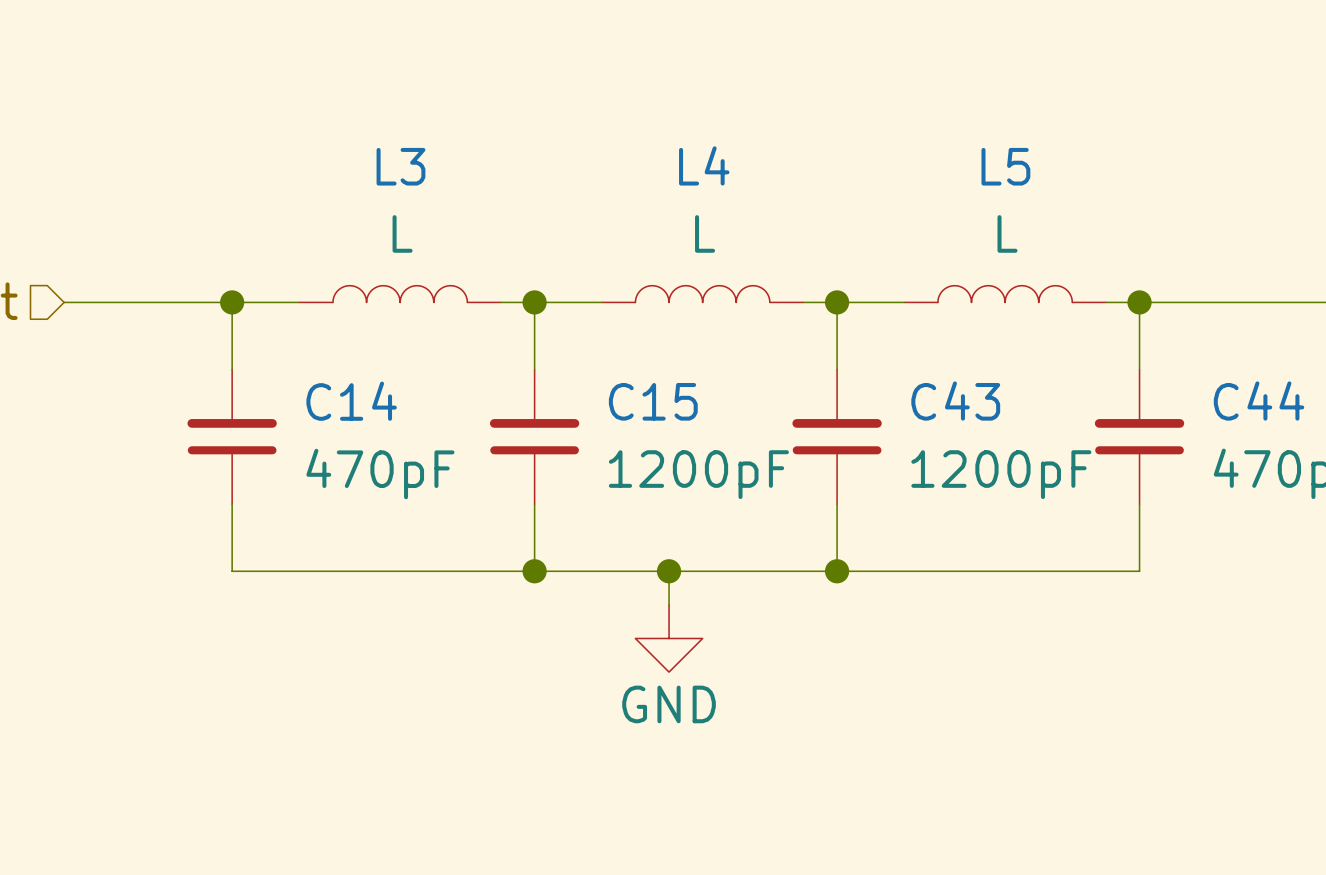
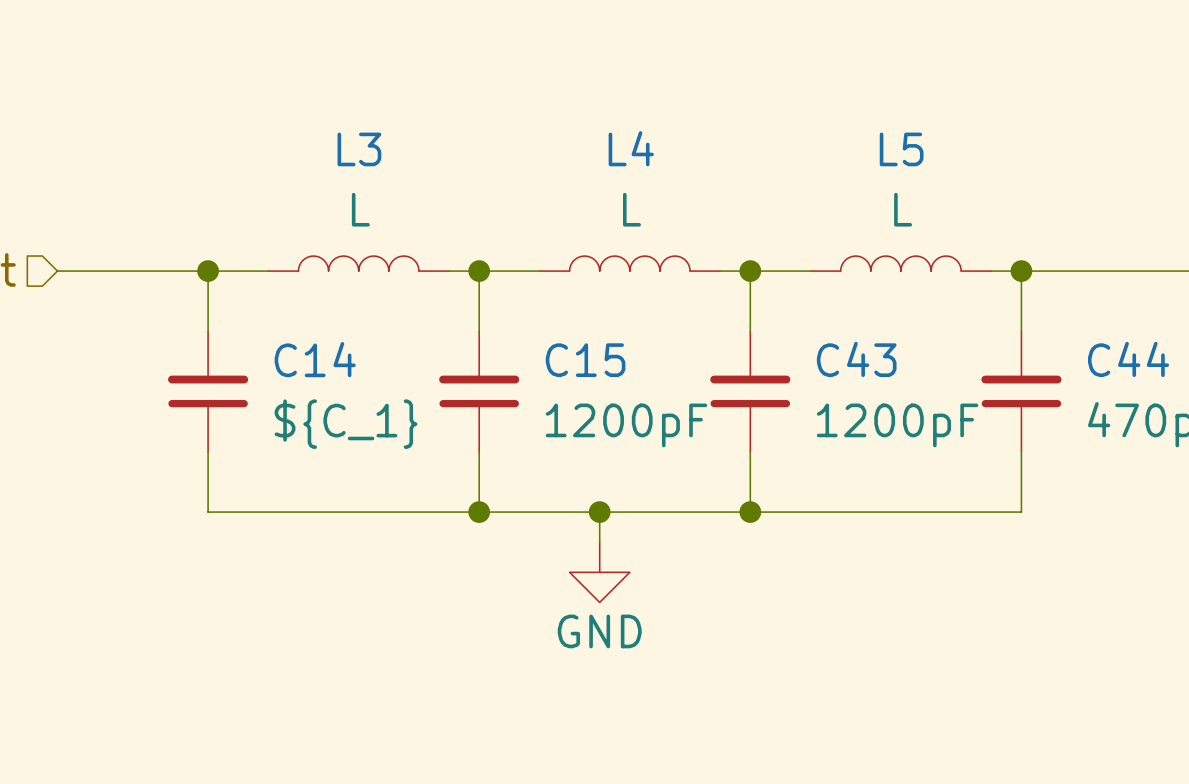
C14 value: 470pF (380, 474) -> ${C_1} (346, 424)

